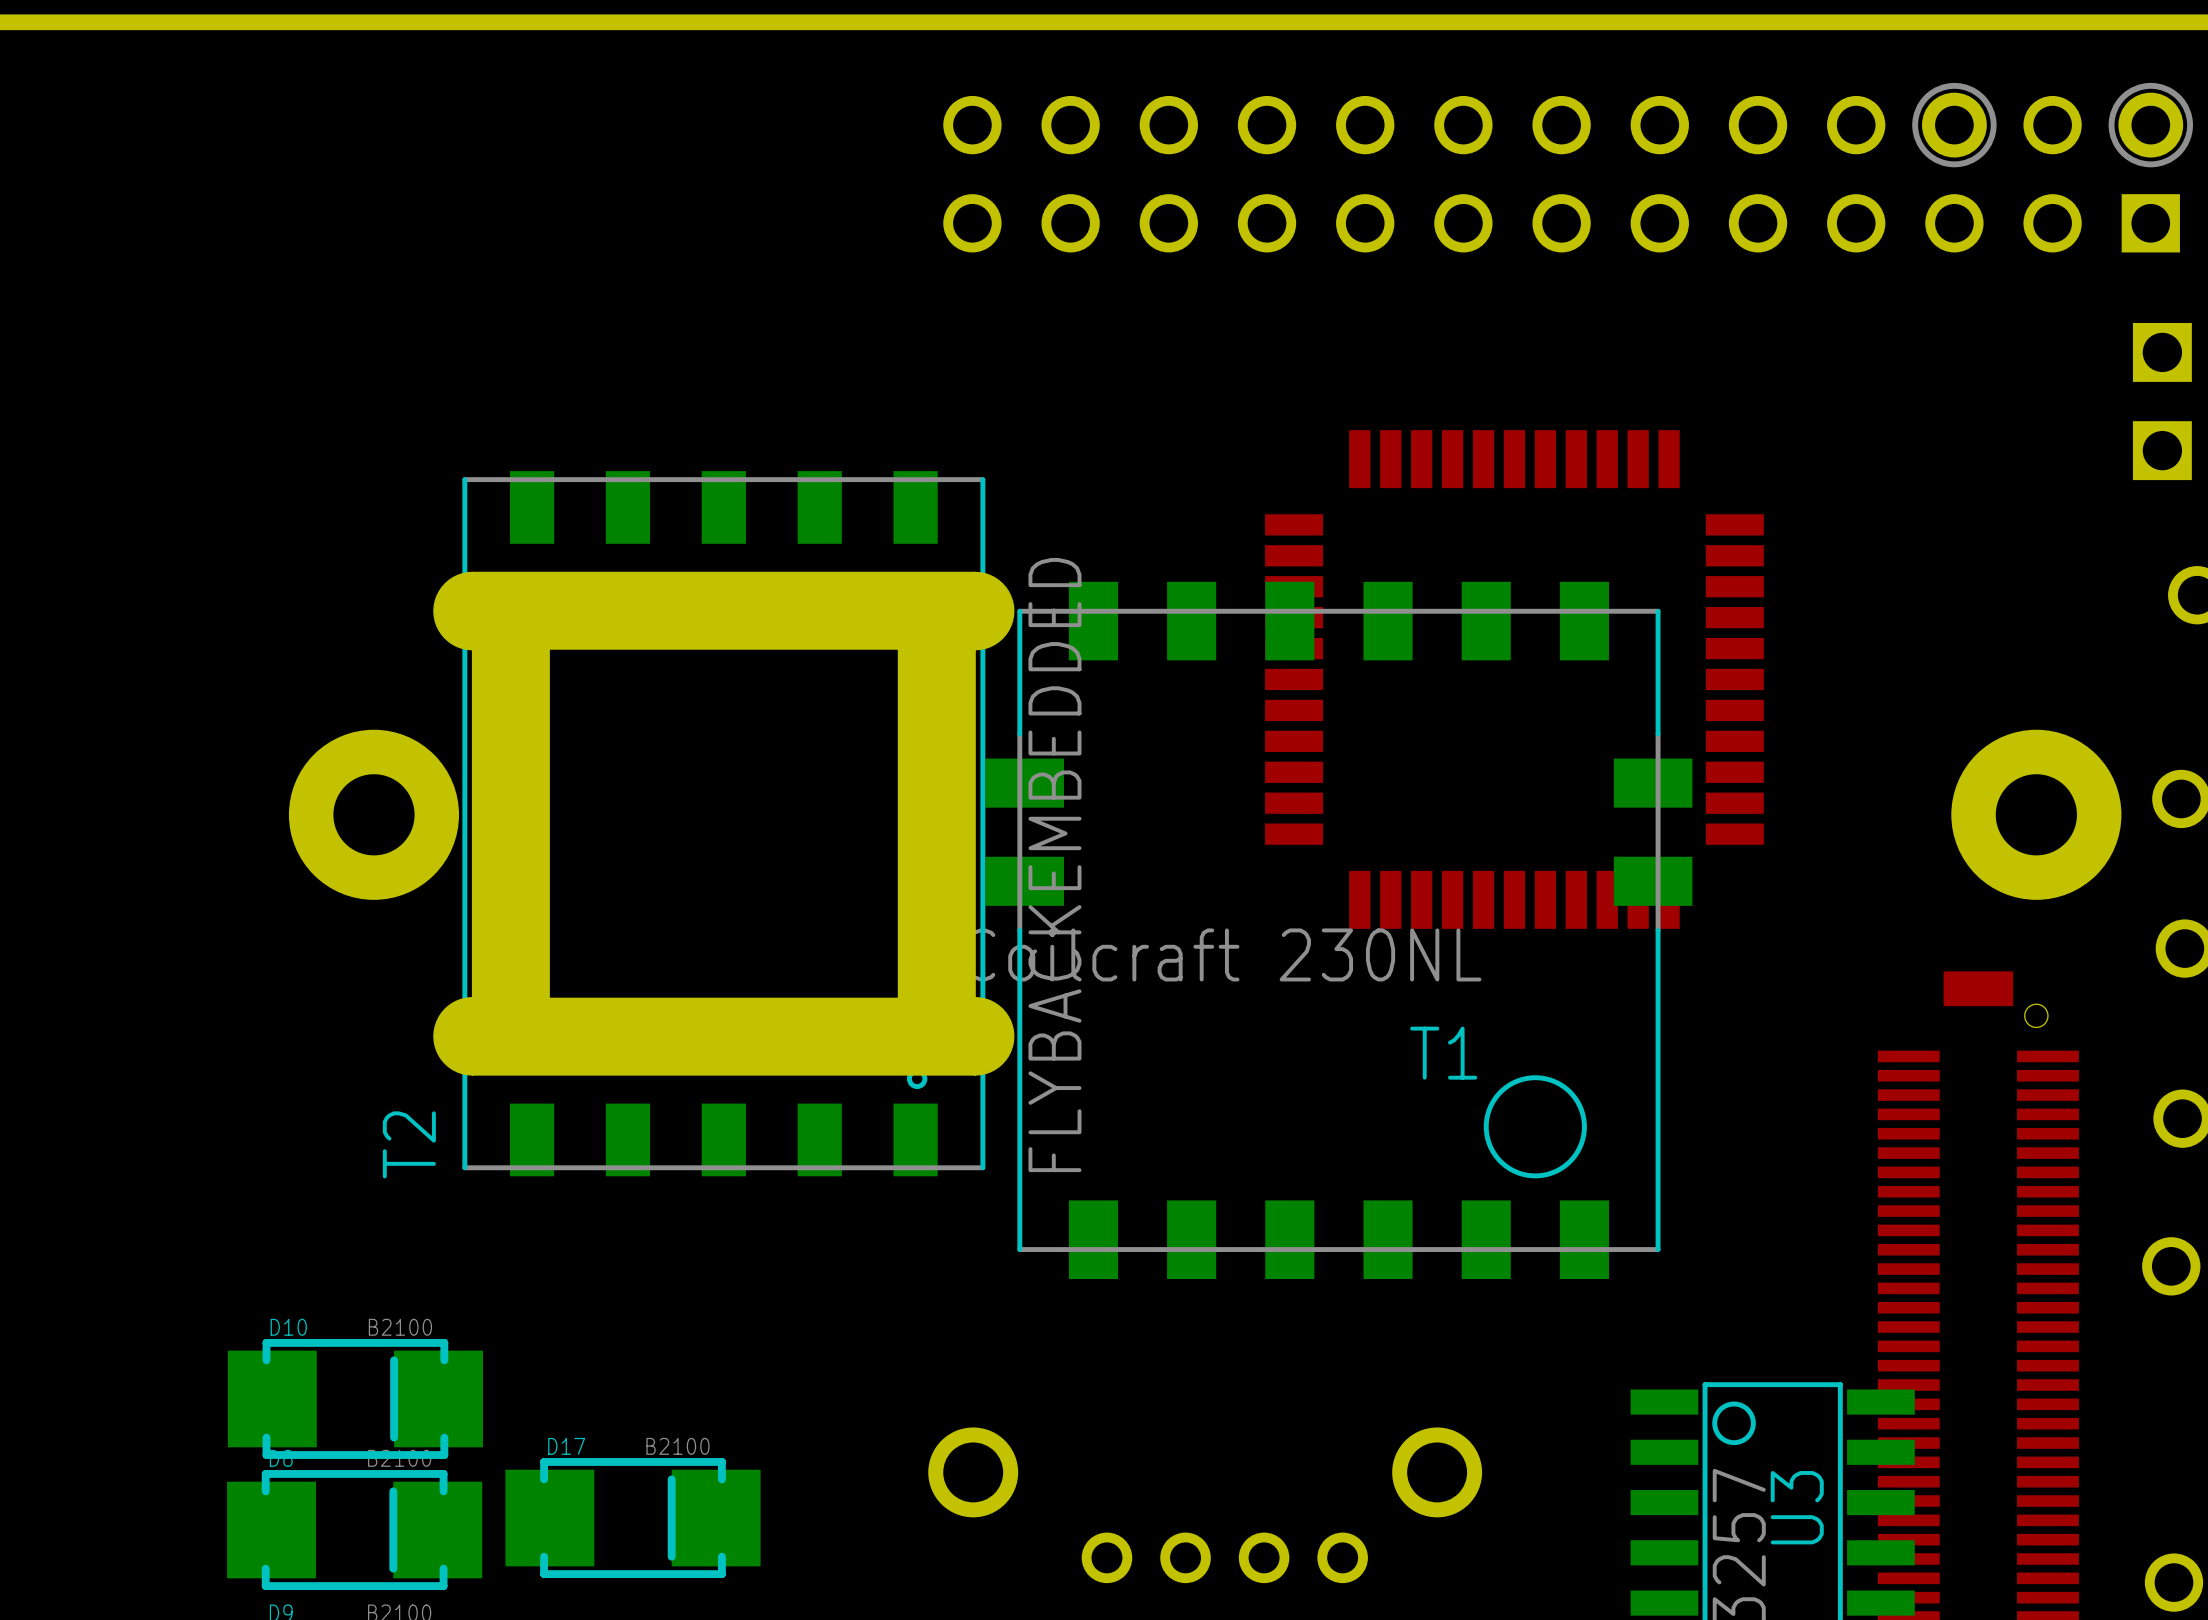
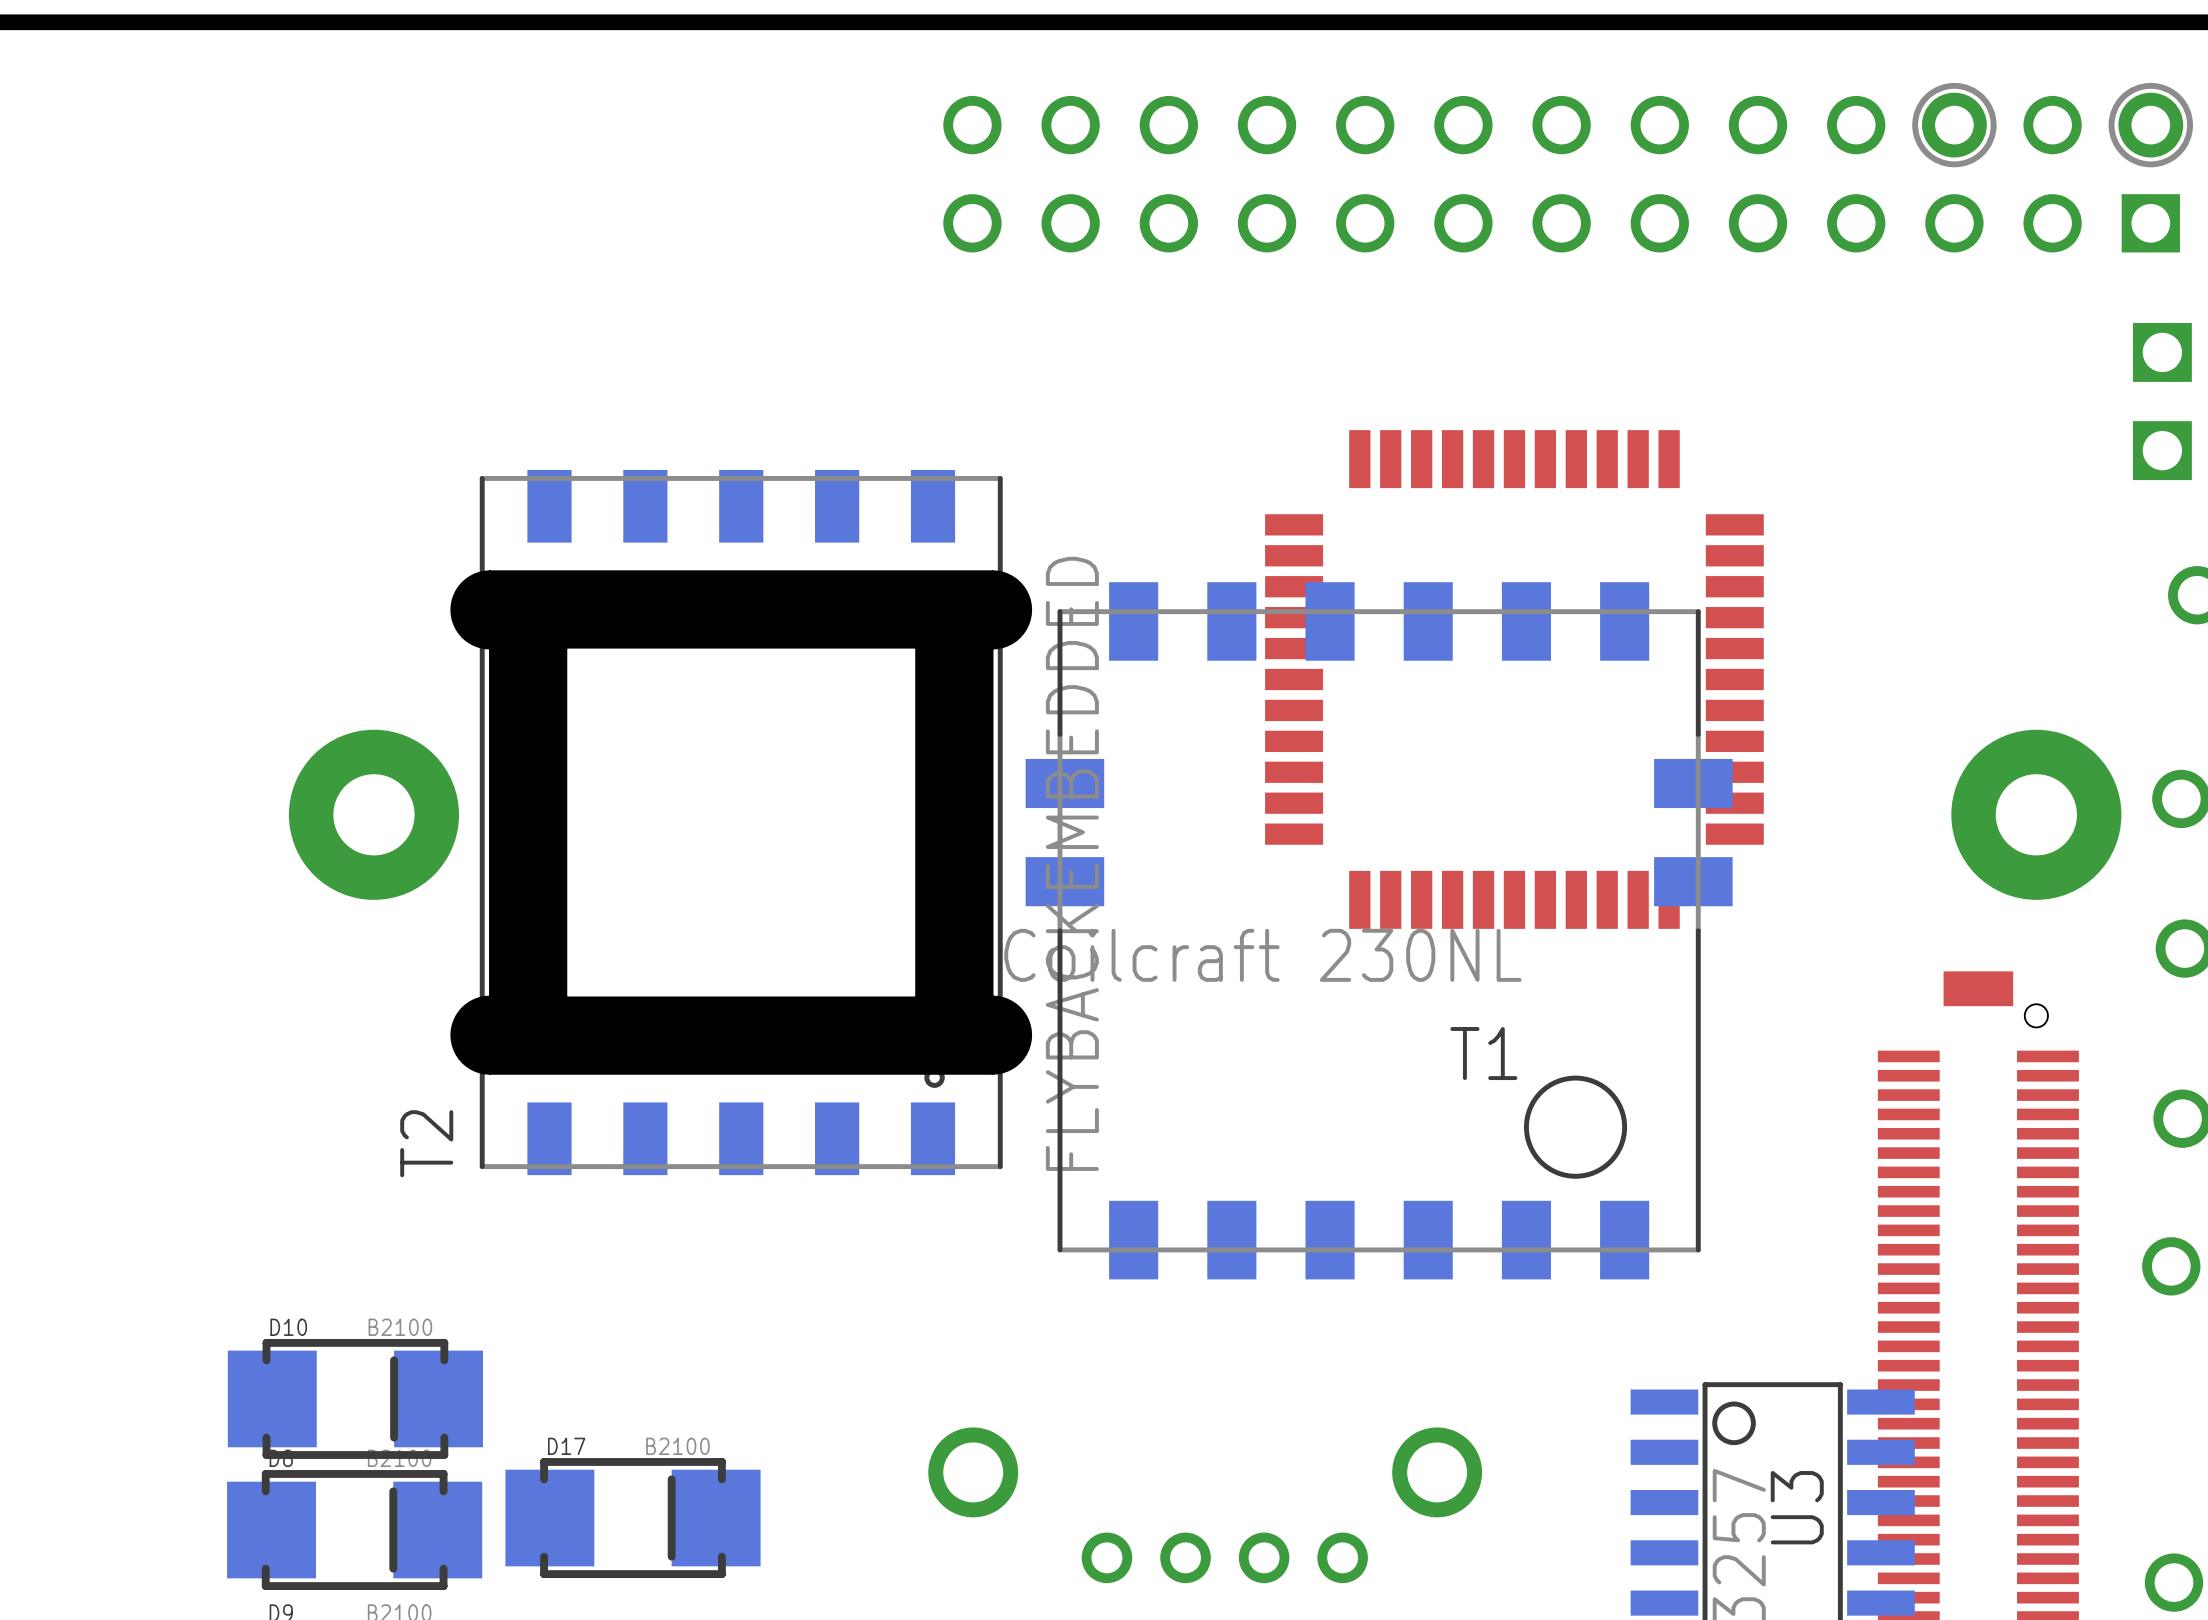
T2 position: (723, 823) -> (741, 822)
T1 position: (1338, 930) -> (1379, 930)

